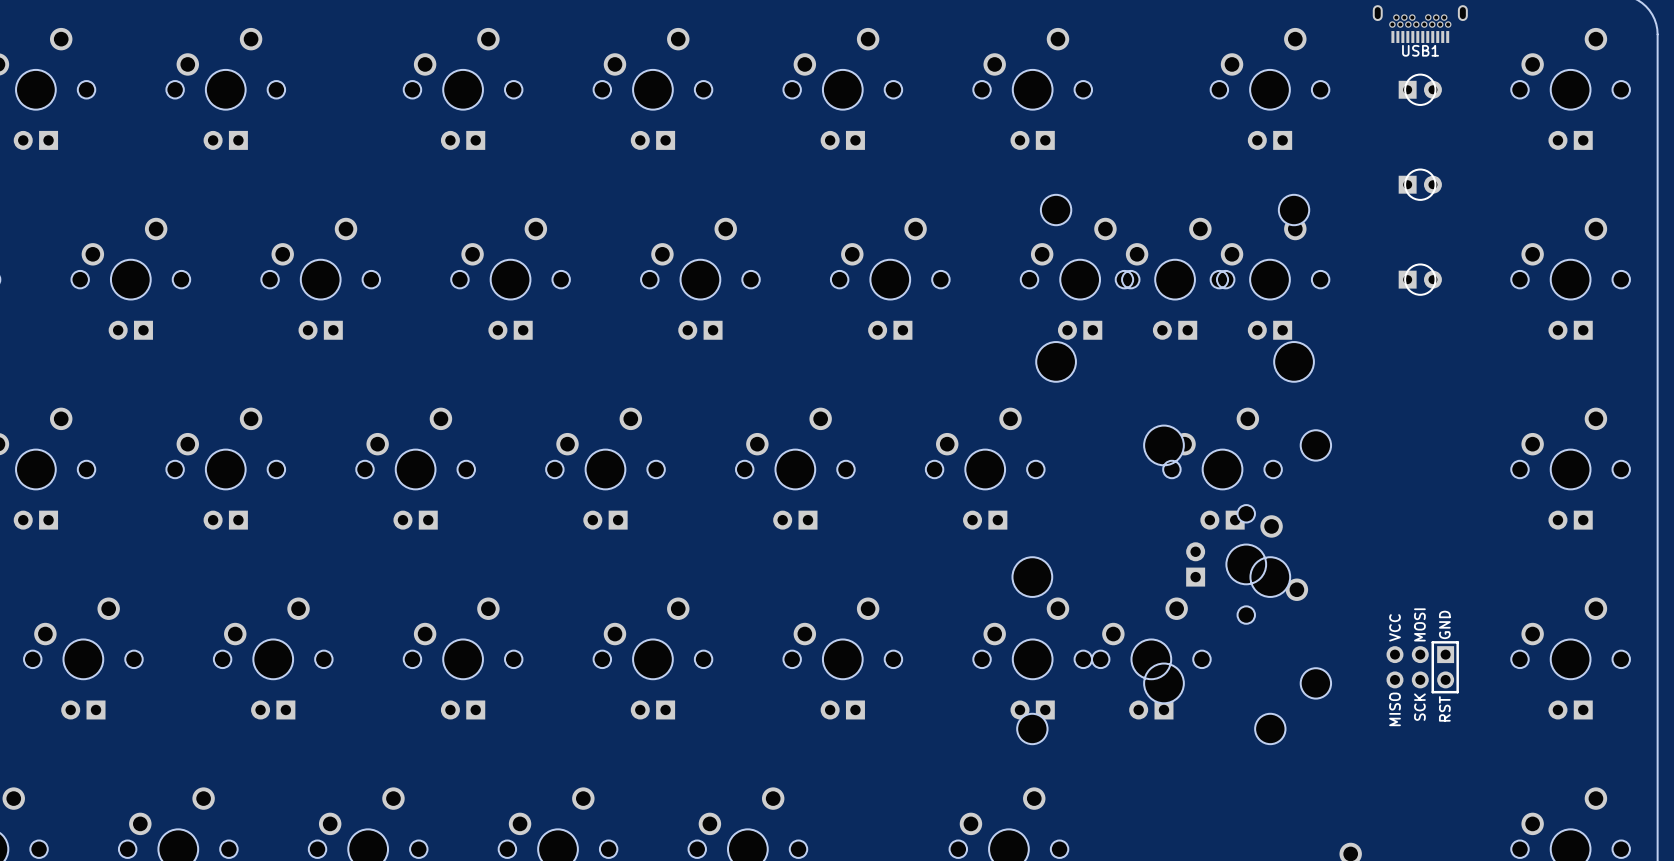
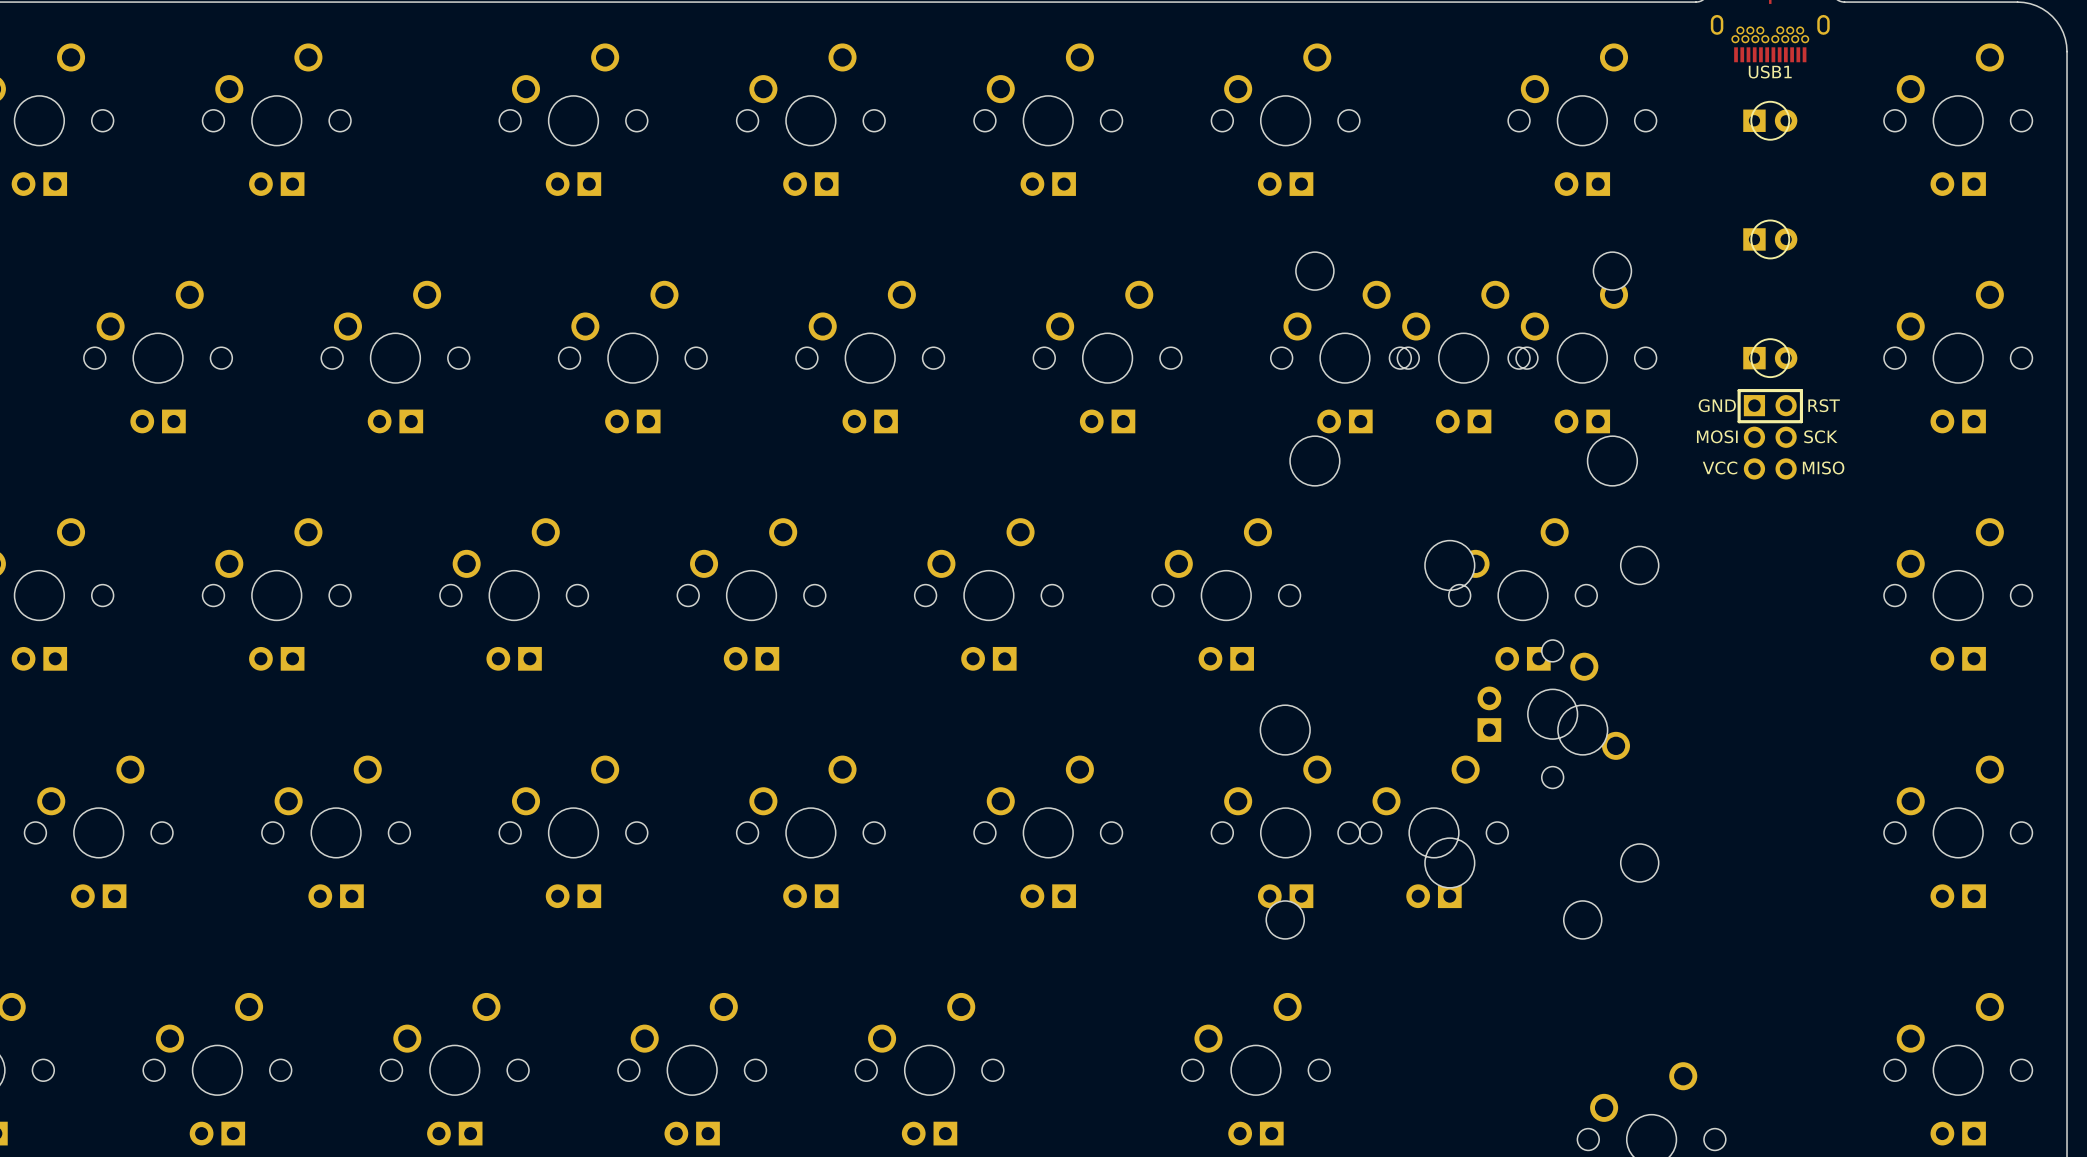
part: none -> (1770, 434)
part: (1422, 667) -> none

